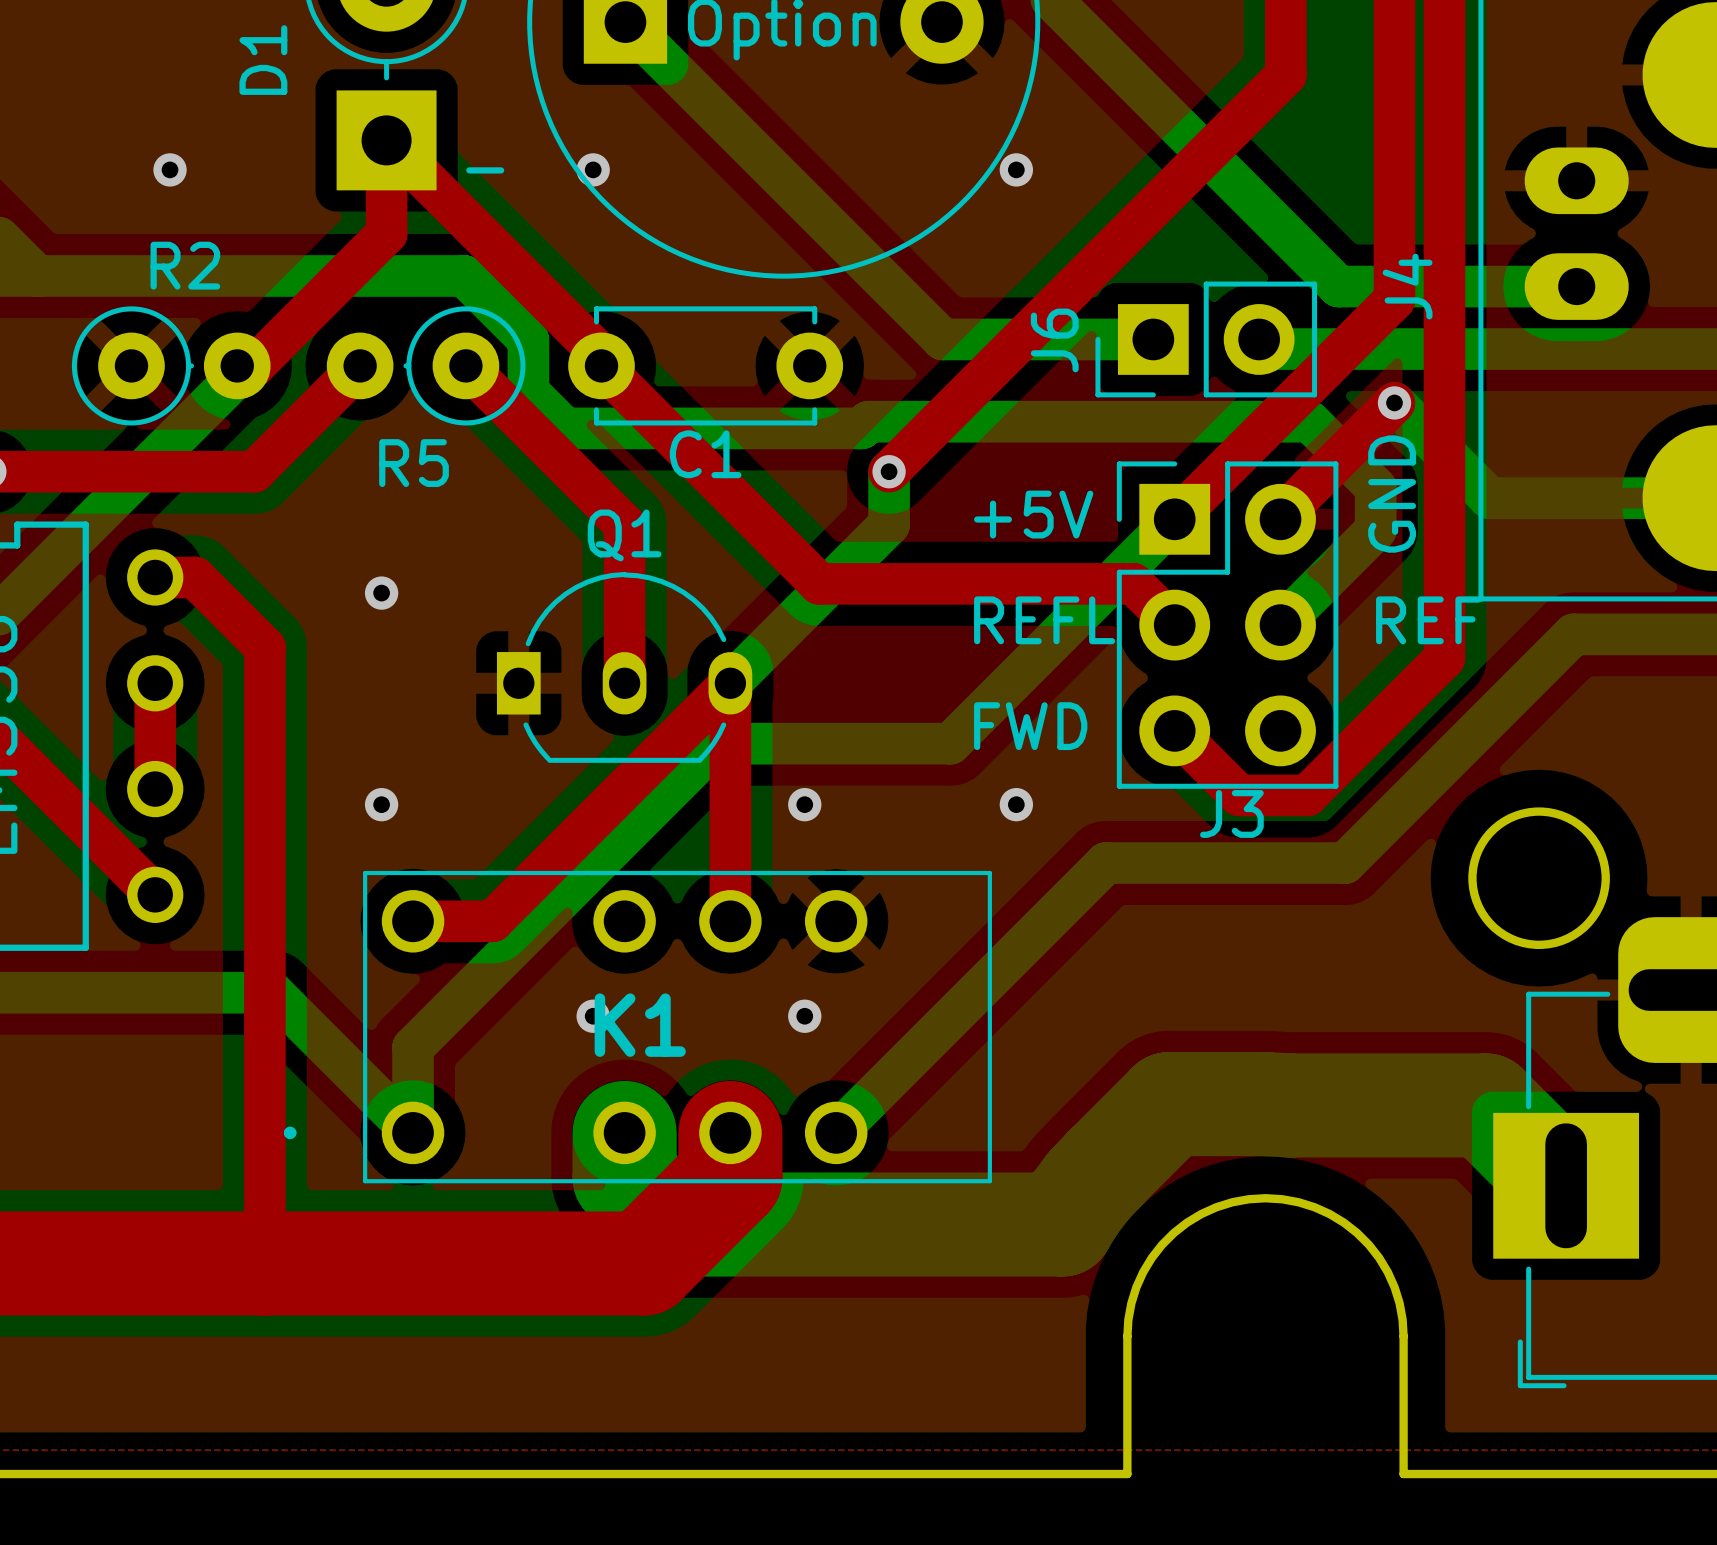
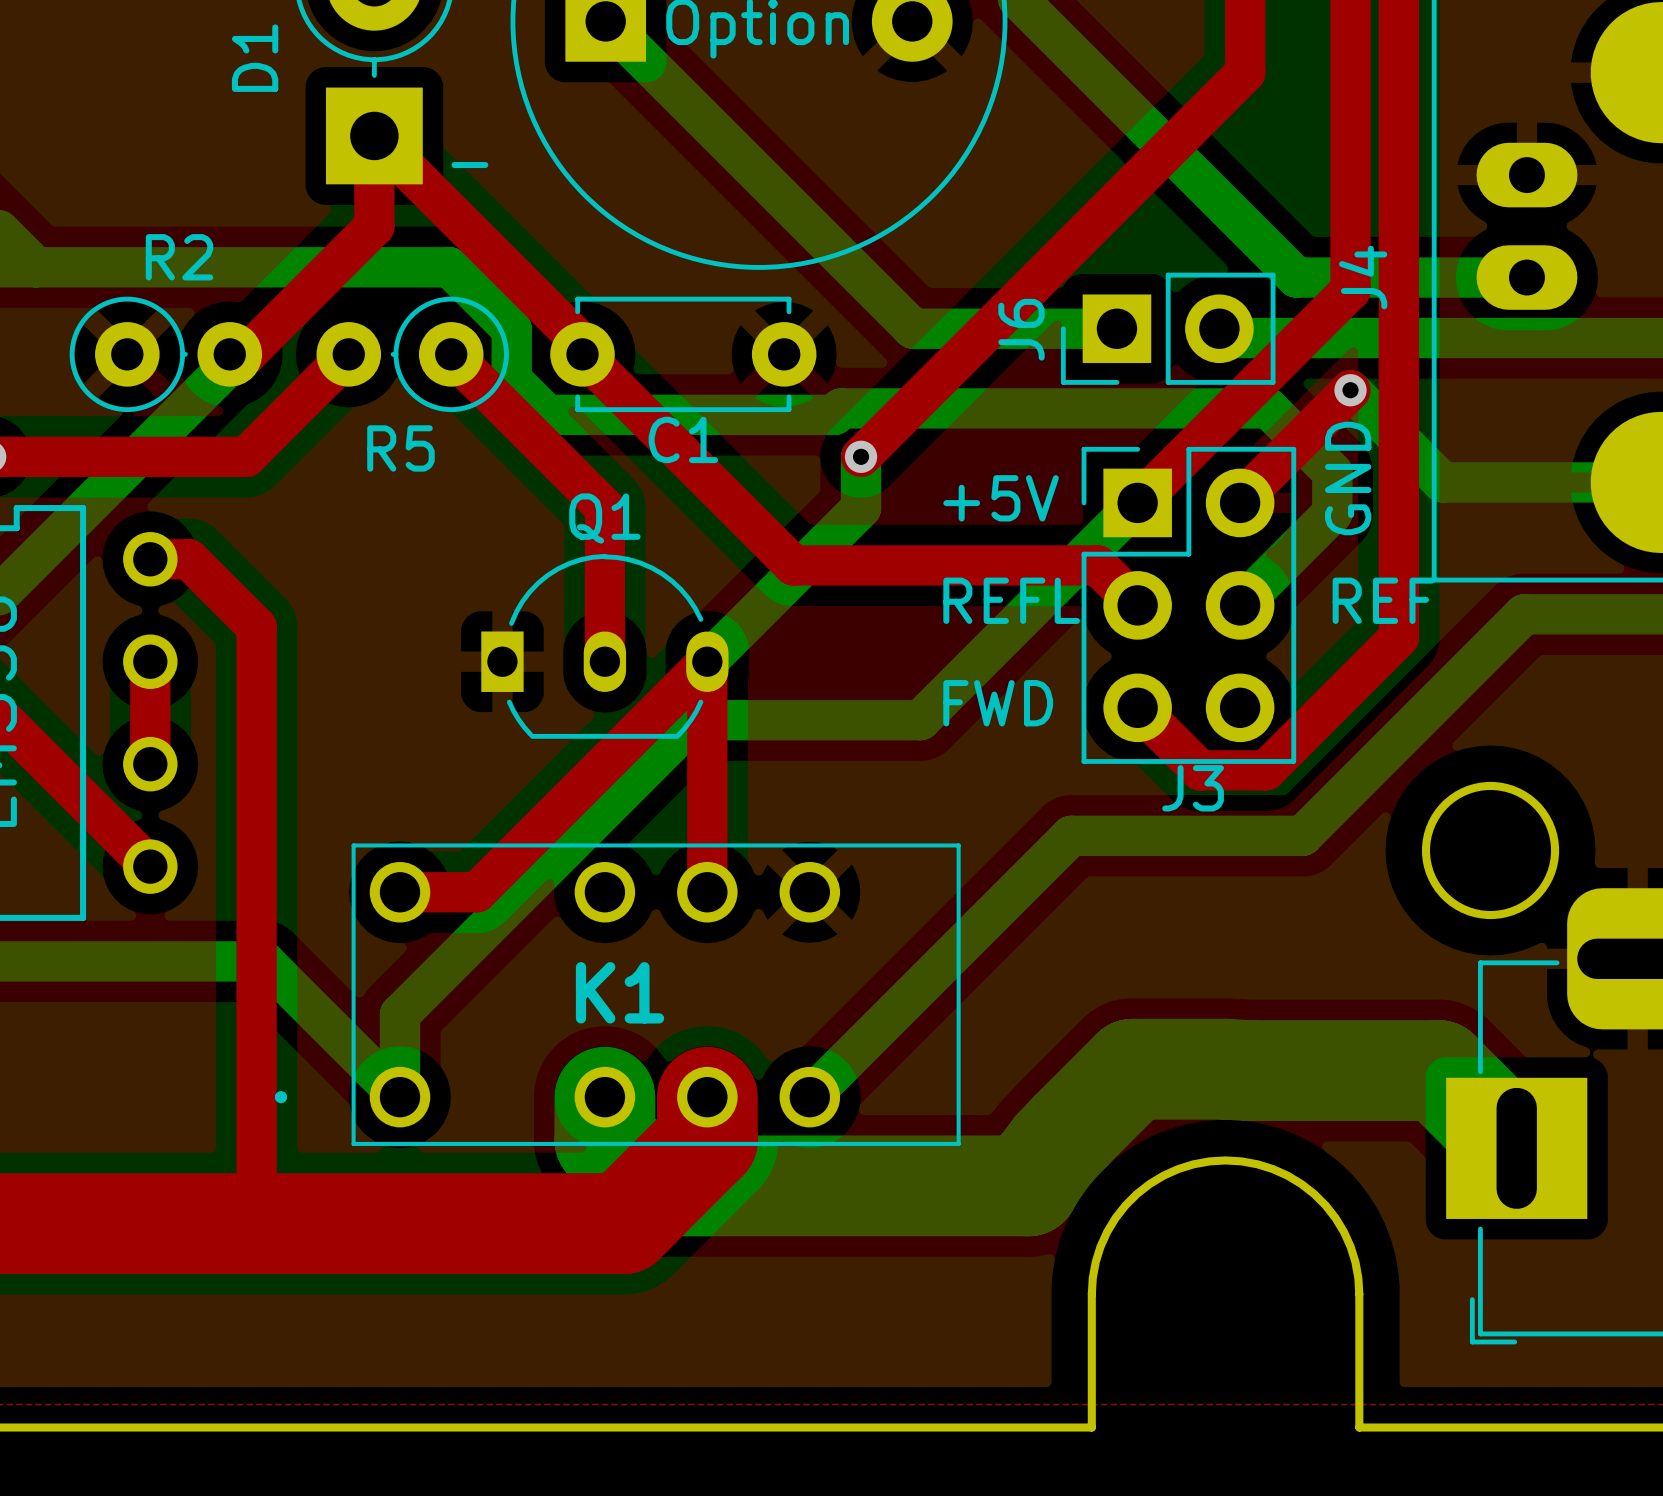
via: (170, 169) -> none
via: (593, 169) -> none
via: (1016, 169) -> none
via: (381, 593) -> none
via: (381, 804) -> none
via: (804, 804) -> none
via: (1016, 804) -> none
via: (593, 1016) -> none
via: (804, 1016) -> none

